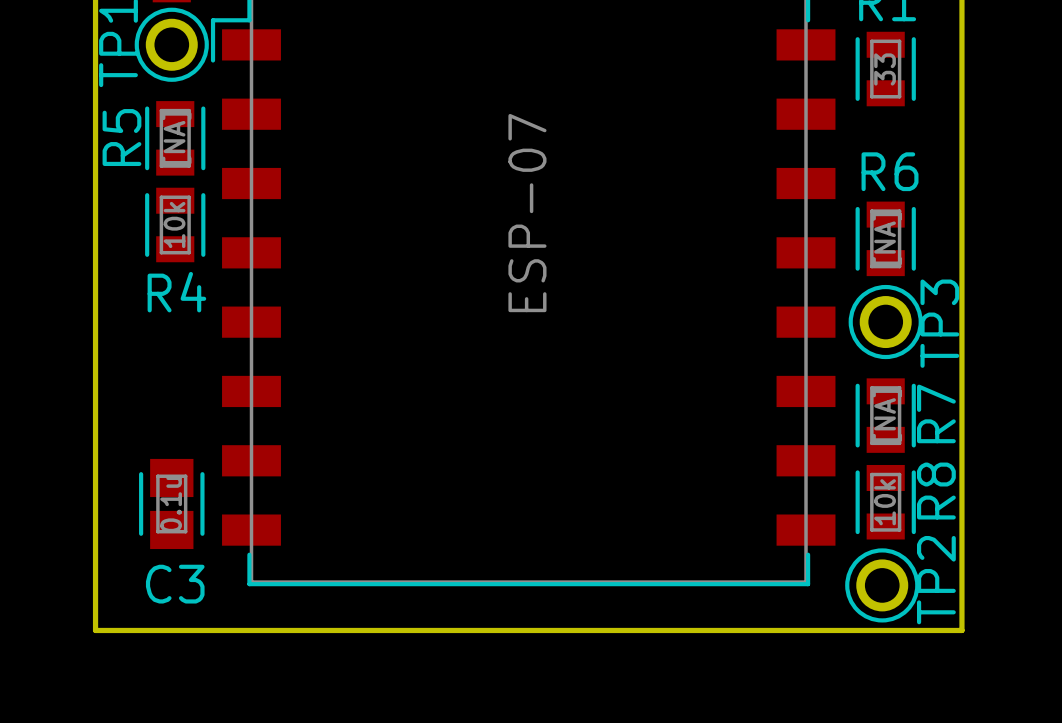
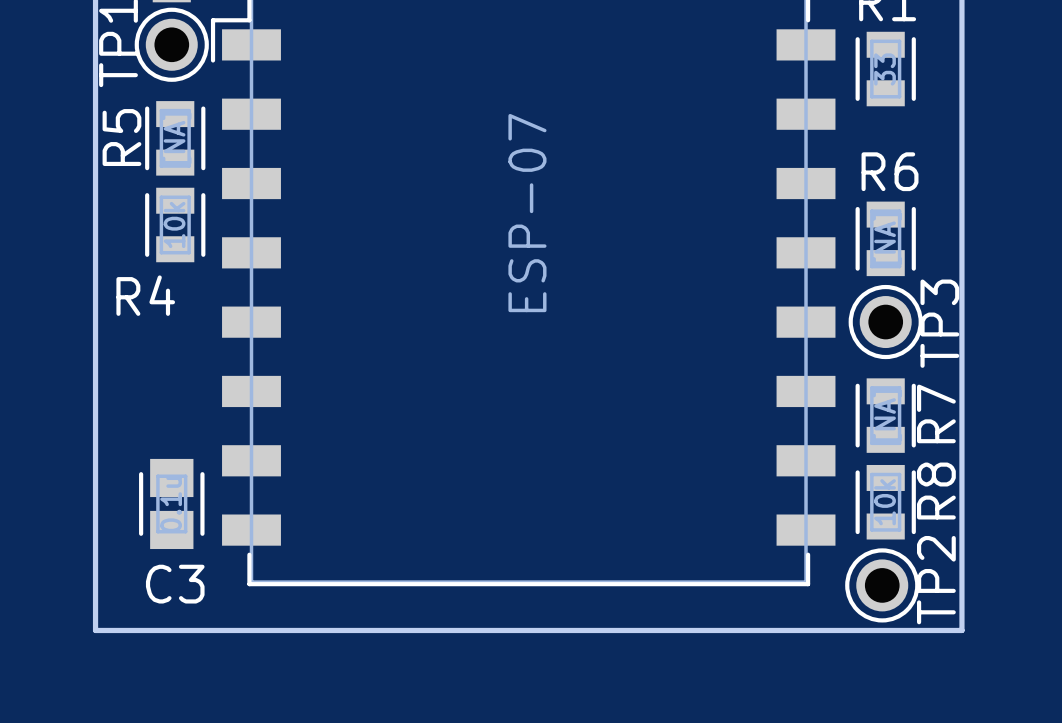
R4 name position: R4 (176, 292) -> R4 (145, 295)

